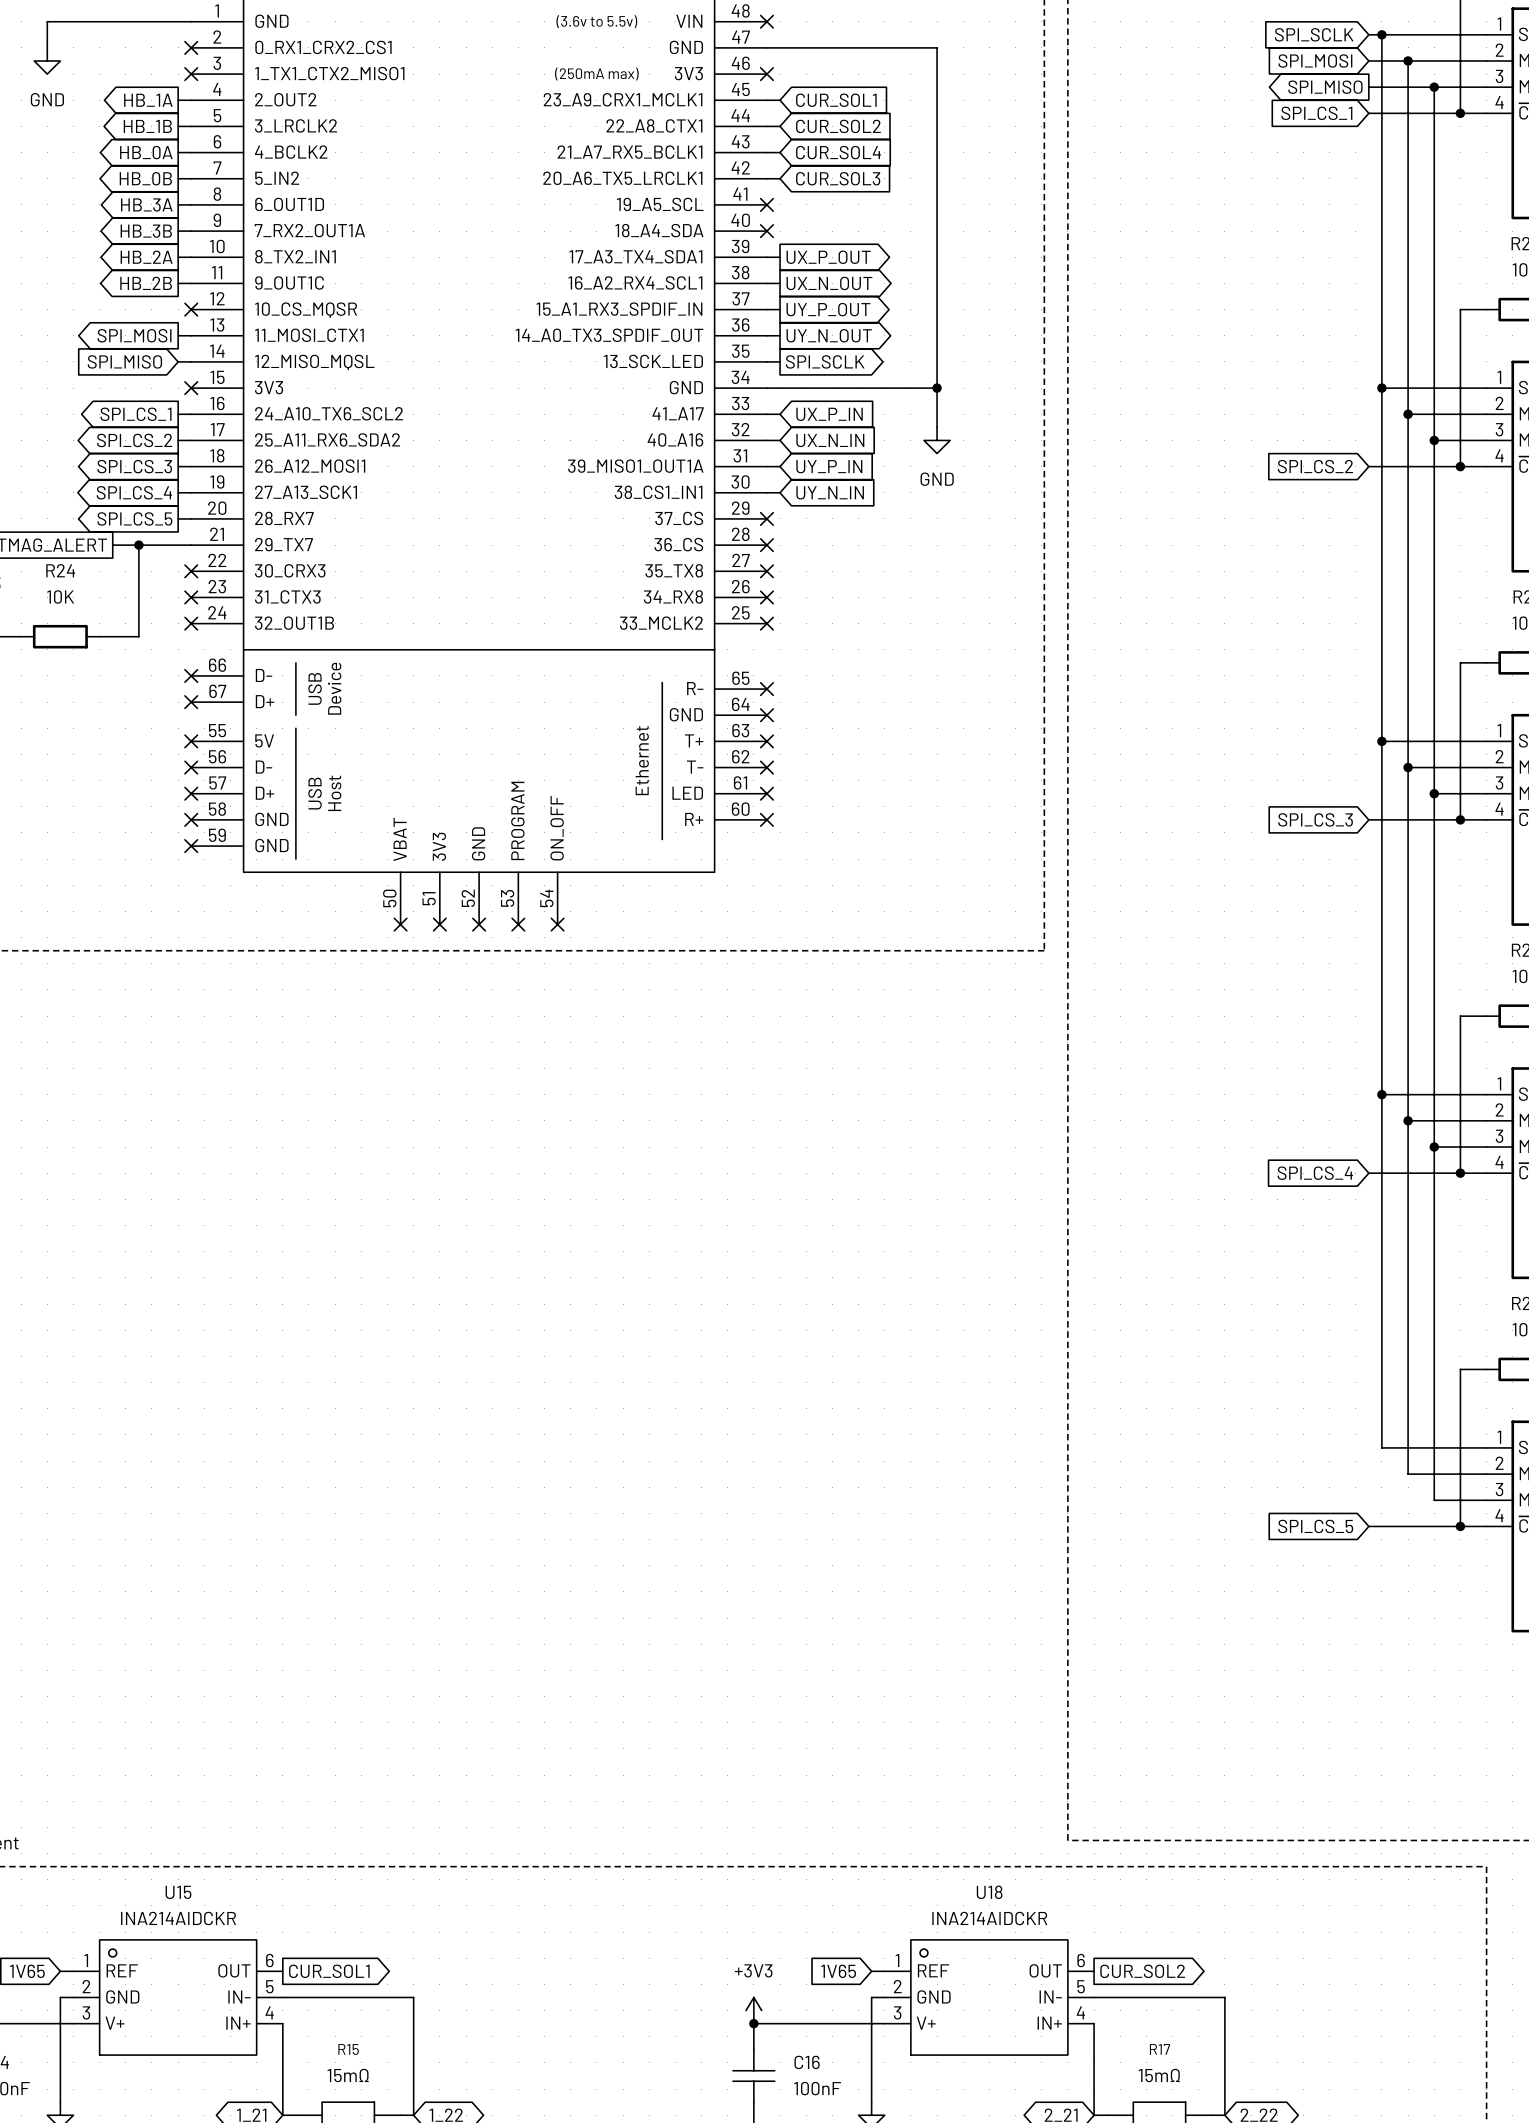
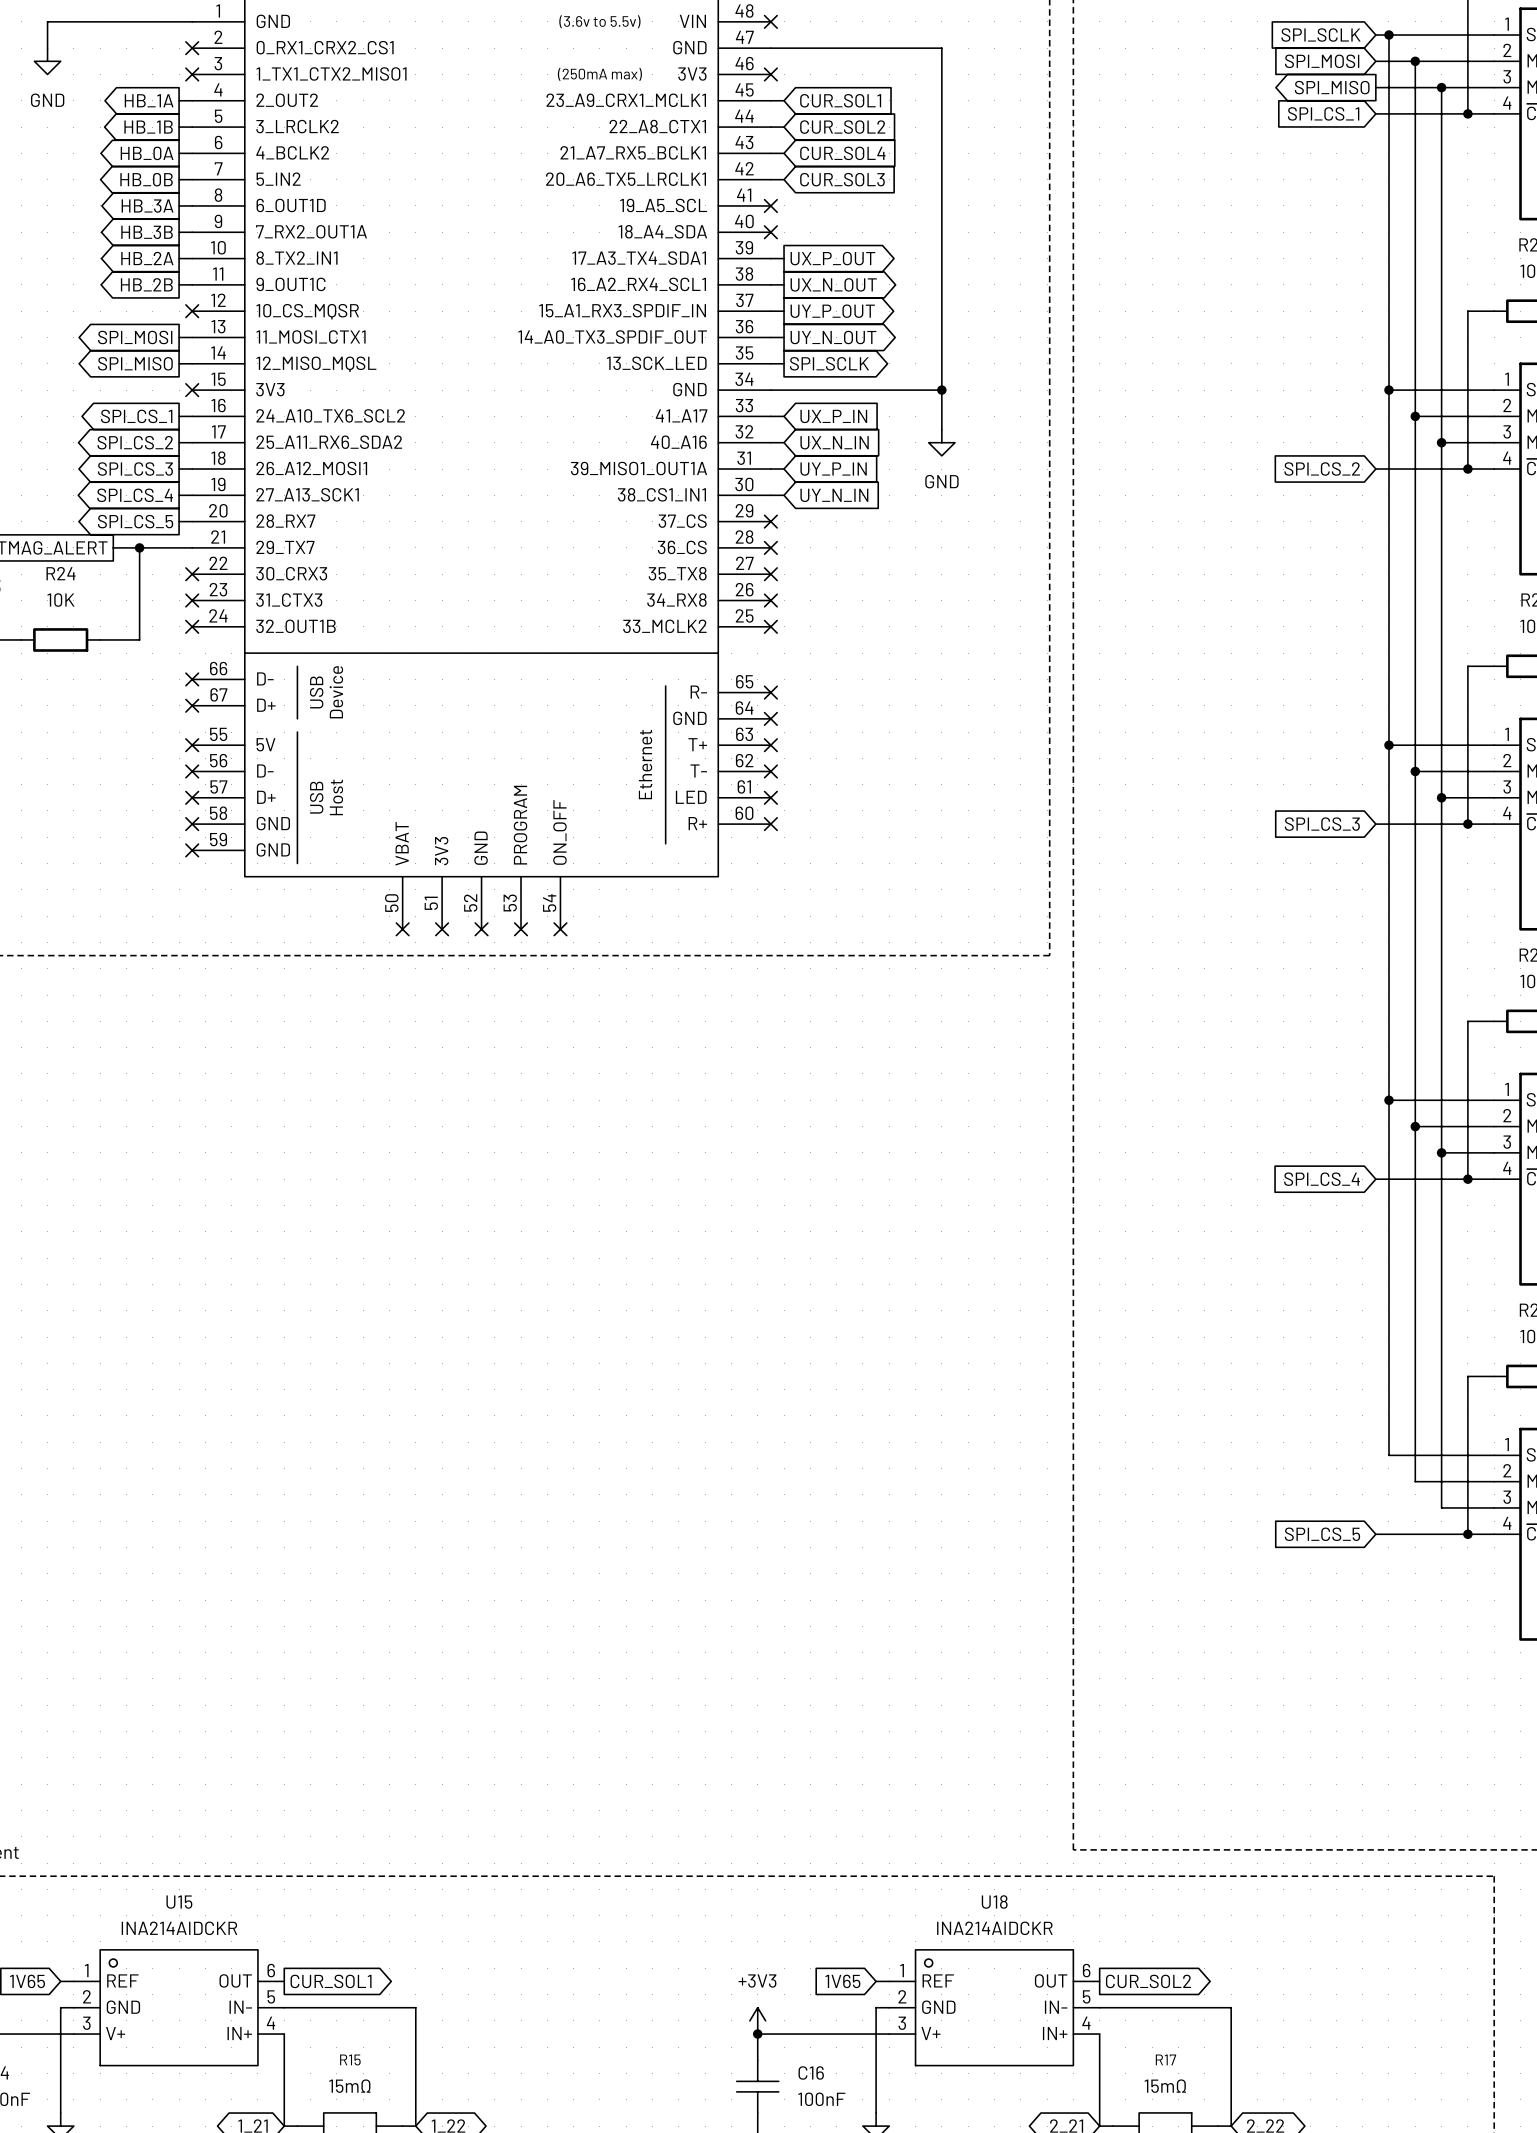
global label shape: input (124, 361) -> output (135, 363)

